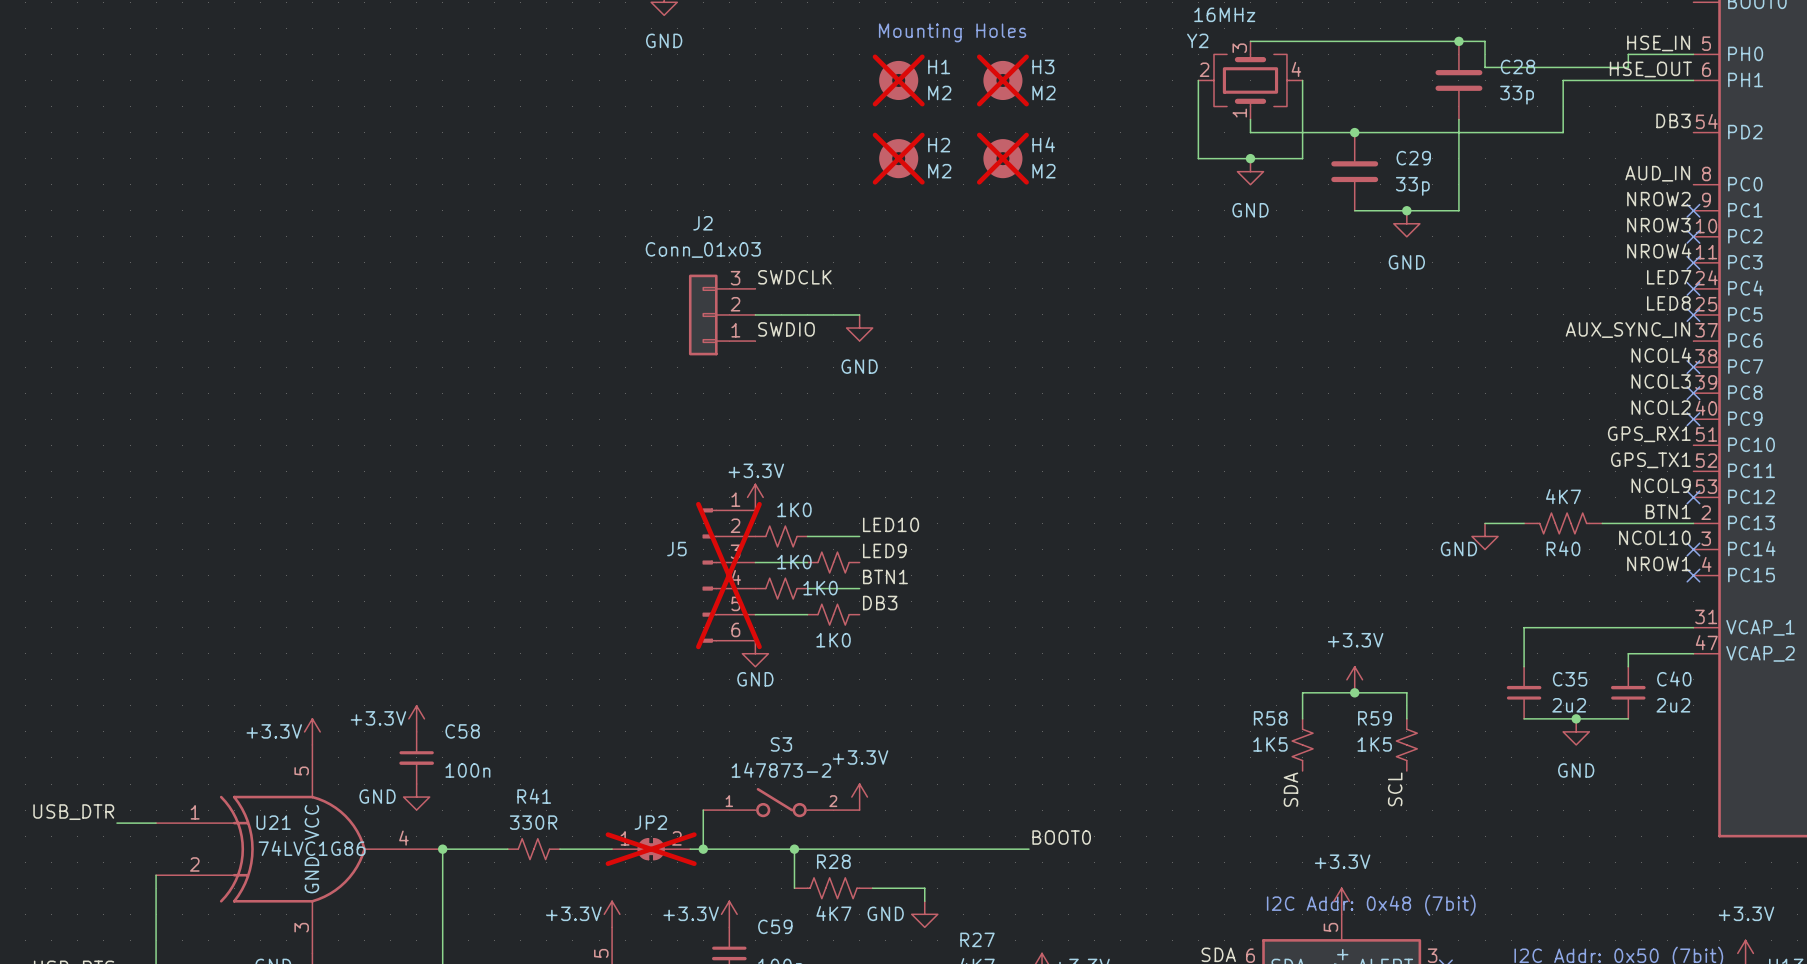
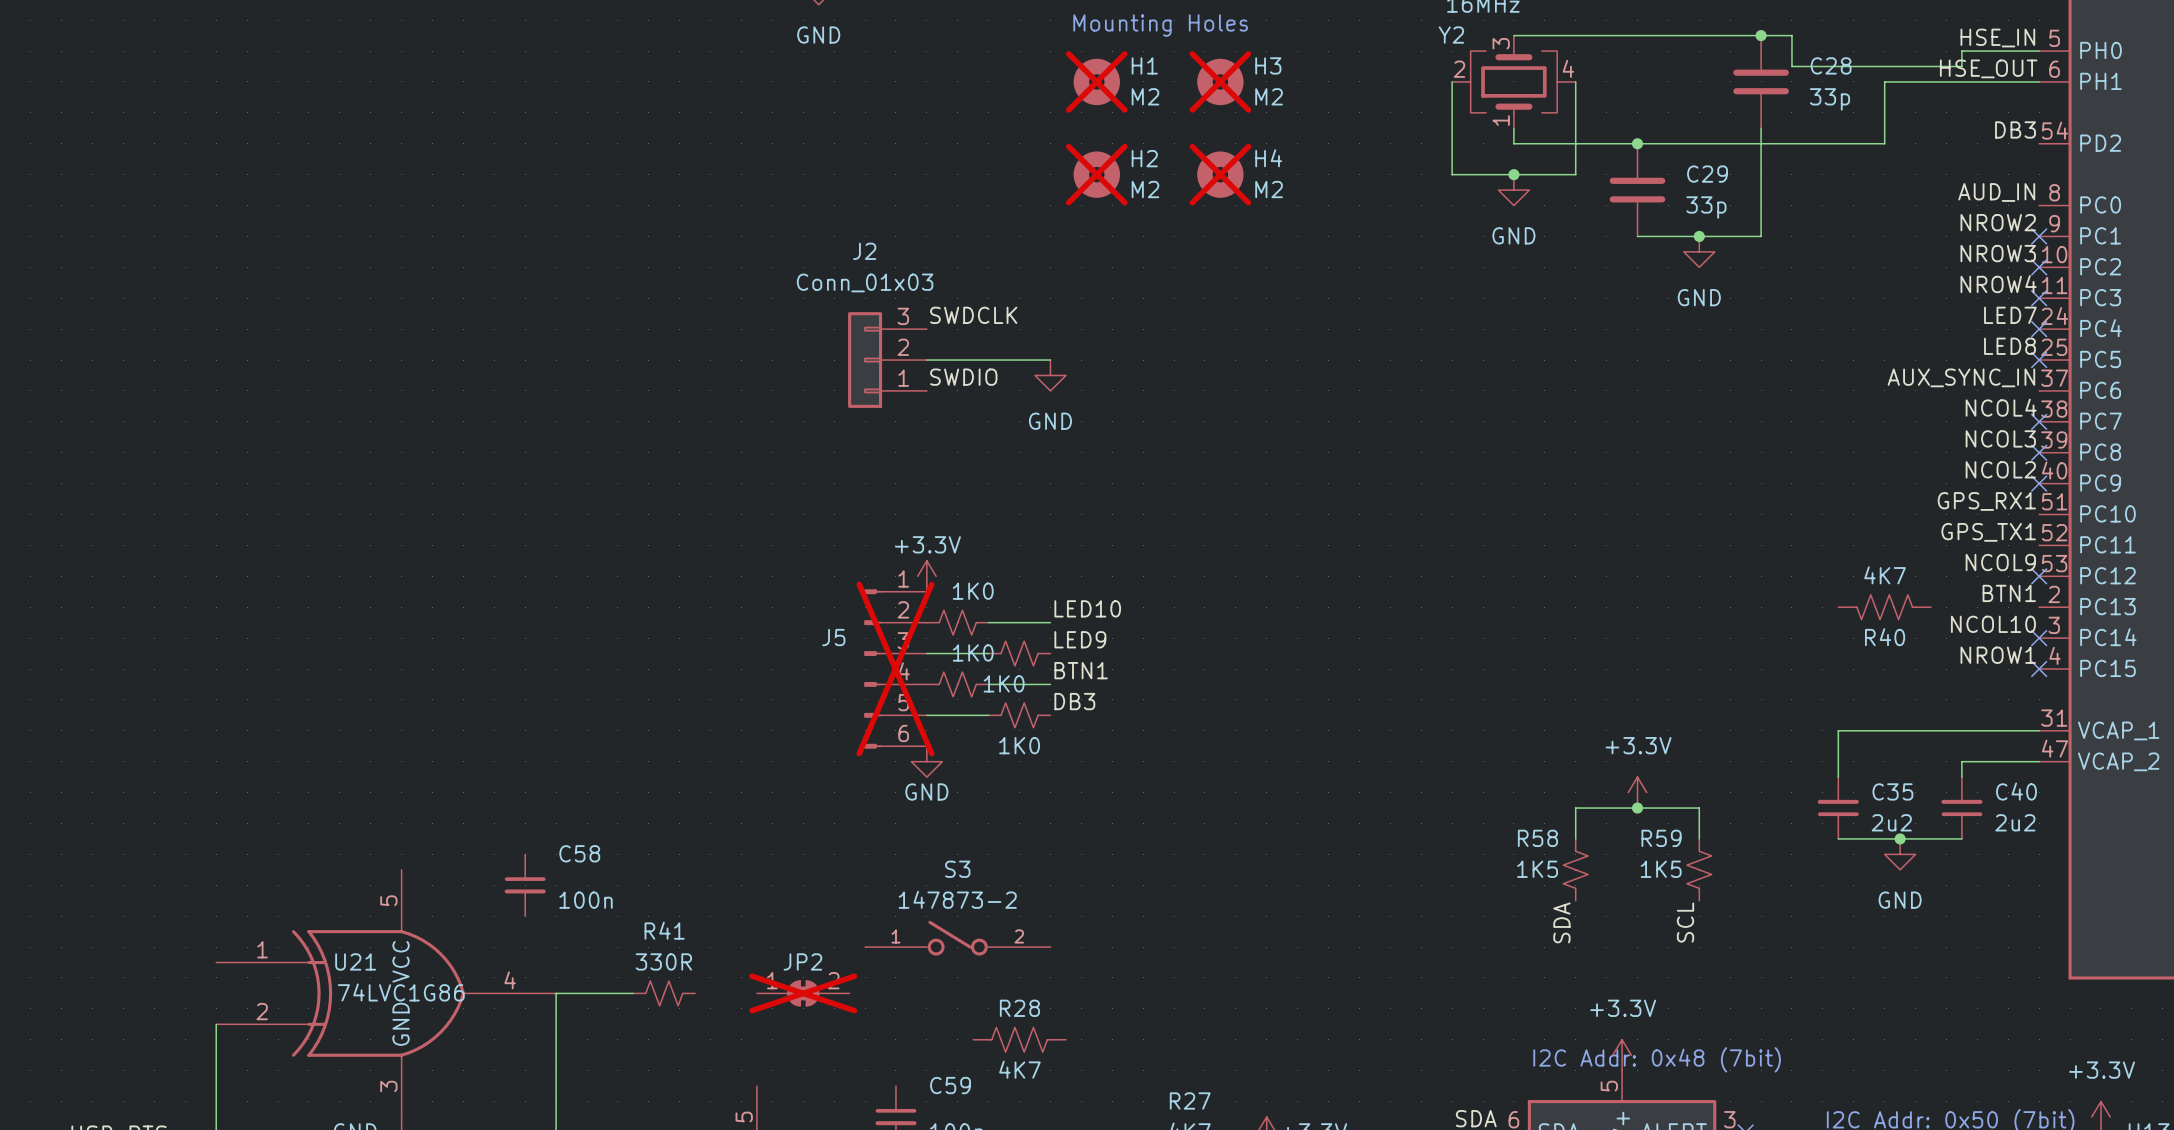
wire: (1485, 523) (1524, 523) -> none
wire: (1602, 523) (1693, 523) -> none
power symbol: GND (1485, 536) -> none
power symbol: +3.3V (416, 718) -> none
power symbol: +3.3V (312, 731) -> none
power symbol: GND (416, 797) -> none
power symbol: +3.3V (859, 797) -> none
wire: (703, 810) (703, 849) -> none
label: USB_DTR (73, 812) -> none
wire: (116, 823) (156, 823) -> none
label: BOOT0 (1061, 837) -> none
junction: (442, 849) -> none
wire: (559, 849) (612, 849) -> none
wire: (690, 849) (1028, 849) -> none
junction: (703, 849) -> none
wire: (794, 849) (794, 888) -> none
junction: (794, 849) -> none
wire: (872, 888) (924, 888) (924, 901) -> none
power symbol: +3.3V (612, 914) -> none
power symbol: +3.3V (729, 914) -> none
power symbol: GND (924, 914) -> none

